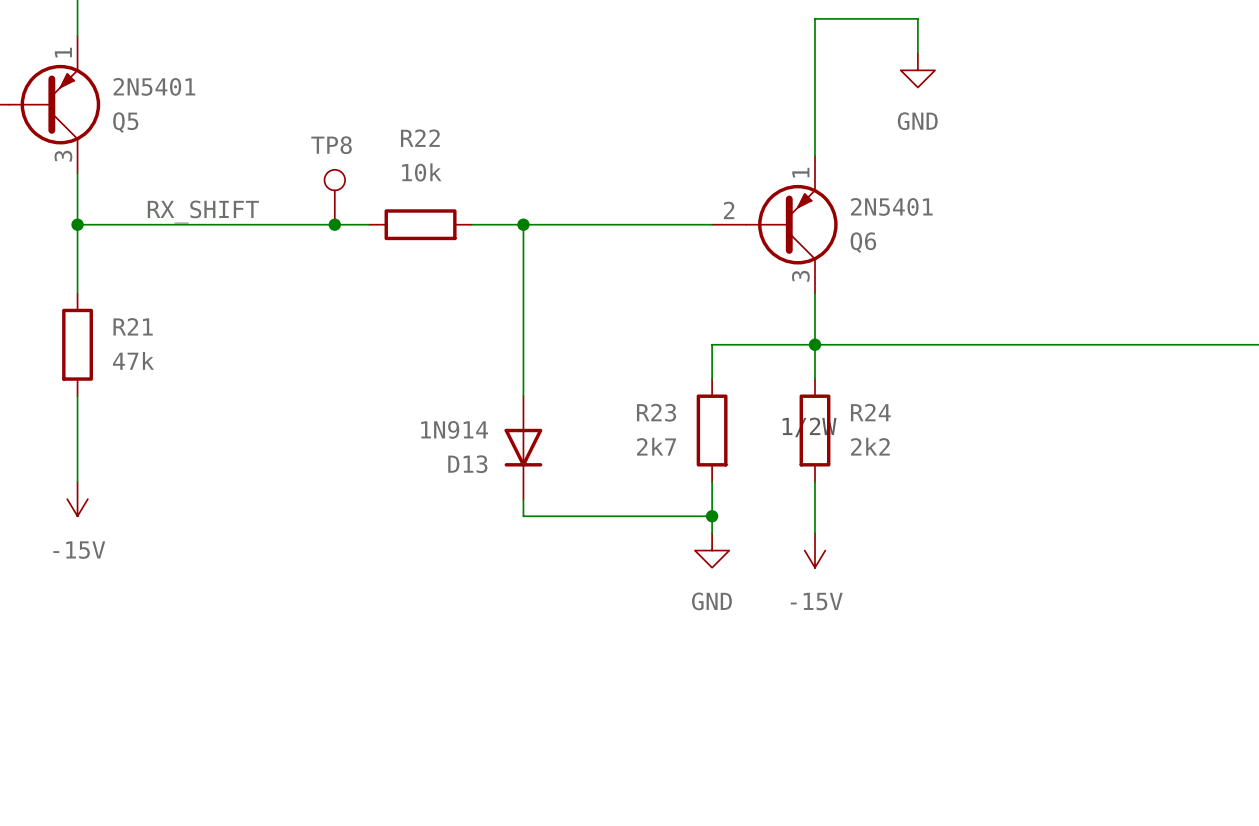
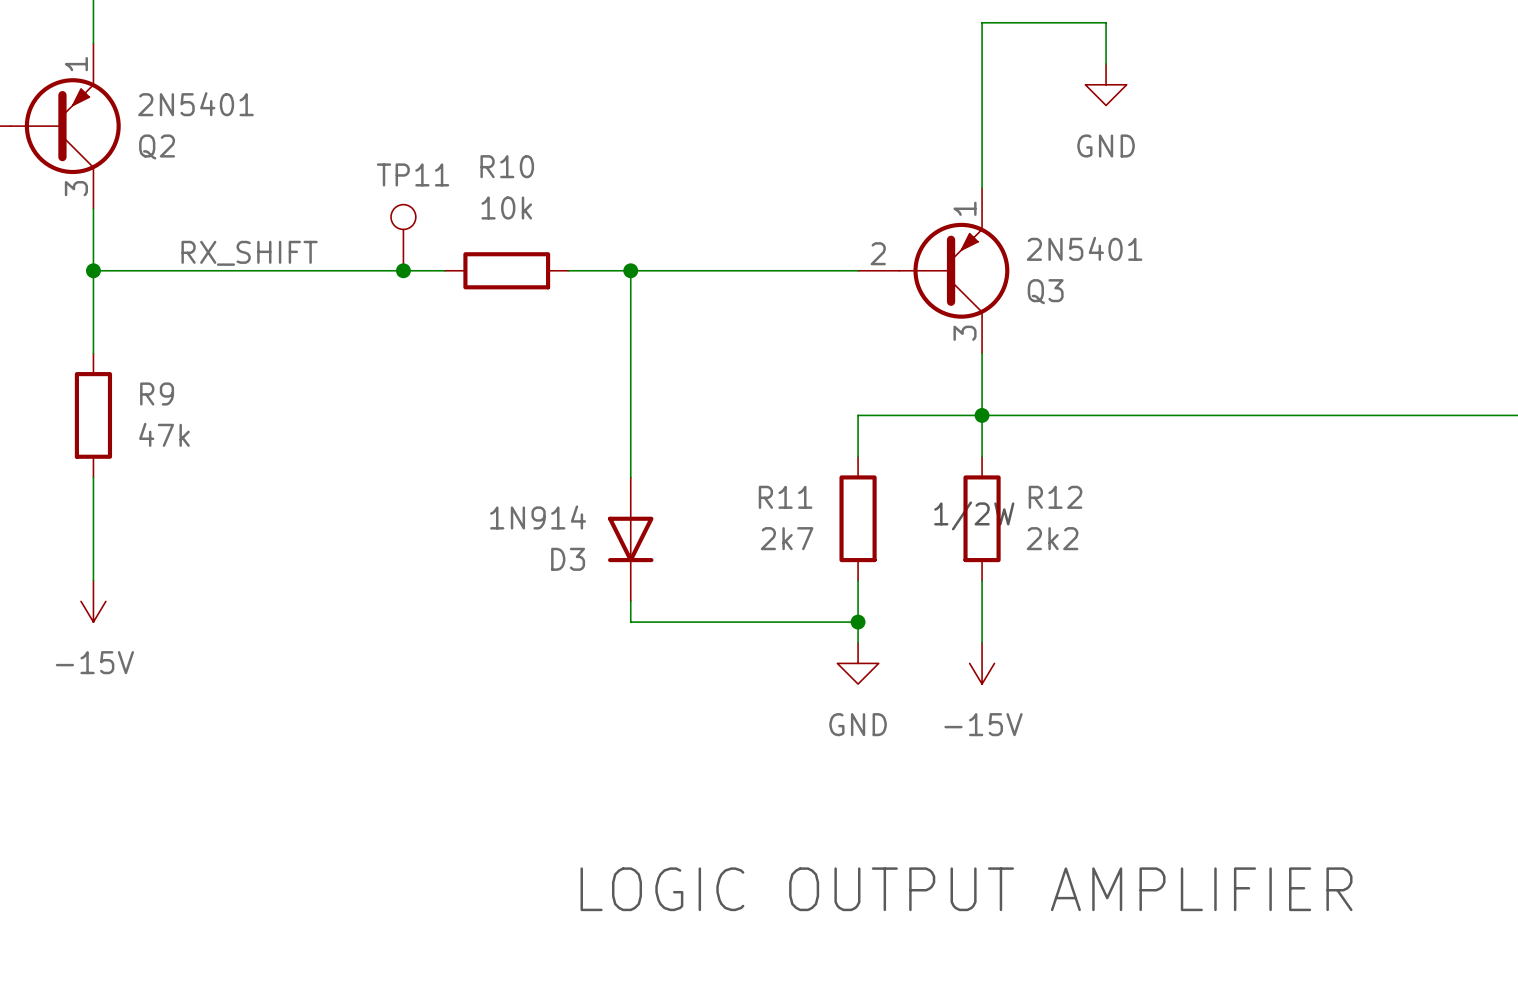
Q5 name: Q5 (125, 122) -> Q2 (157, 146)
R22 name: R22 (420, 138) -> R10 (507, 166)
TP8 name: TP8 (331, 145) -> TP11 (413, 174)
Q6 name: Q6 (863, 242) -> Q3 (1045, 291)
R21 name: R21 (133, 326) -> R9 (157, 393)
R23 name: R23 (656, 412) -> R11 (785, 497)
R24 name: R24 (870, 412) -> R12 (1055, 497)
D13 name: D13 (467, 464) -> D3 (568, 559)
text: none -> LOGIC OUTPUT AMPLIFIER (966, 889)

